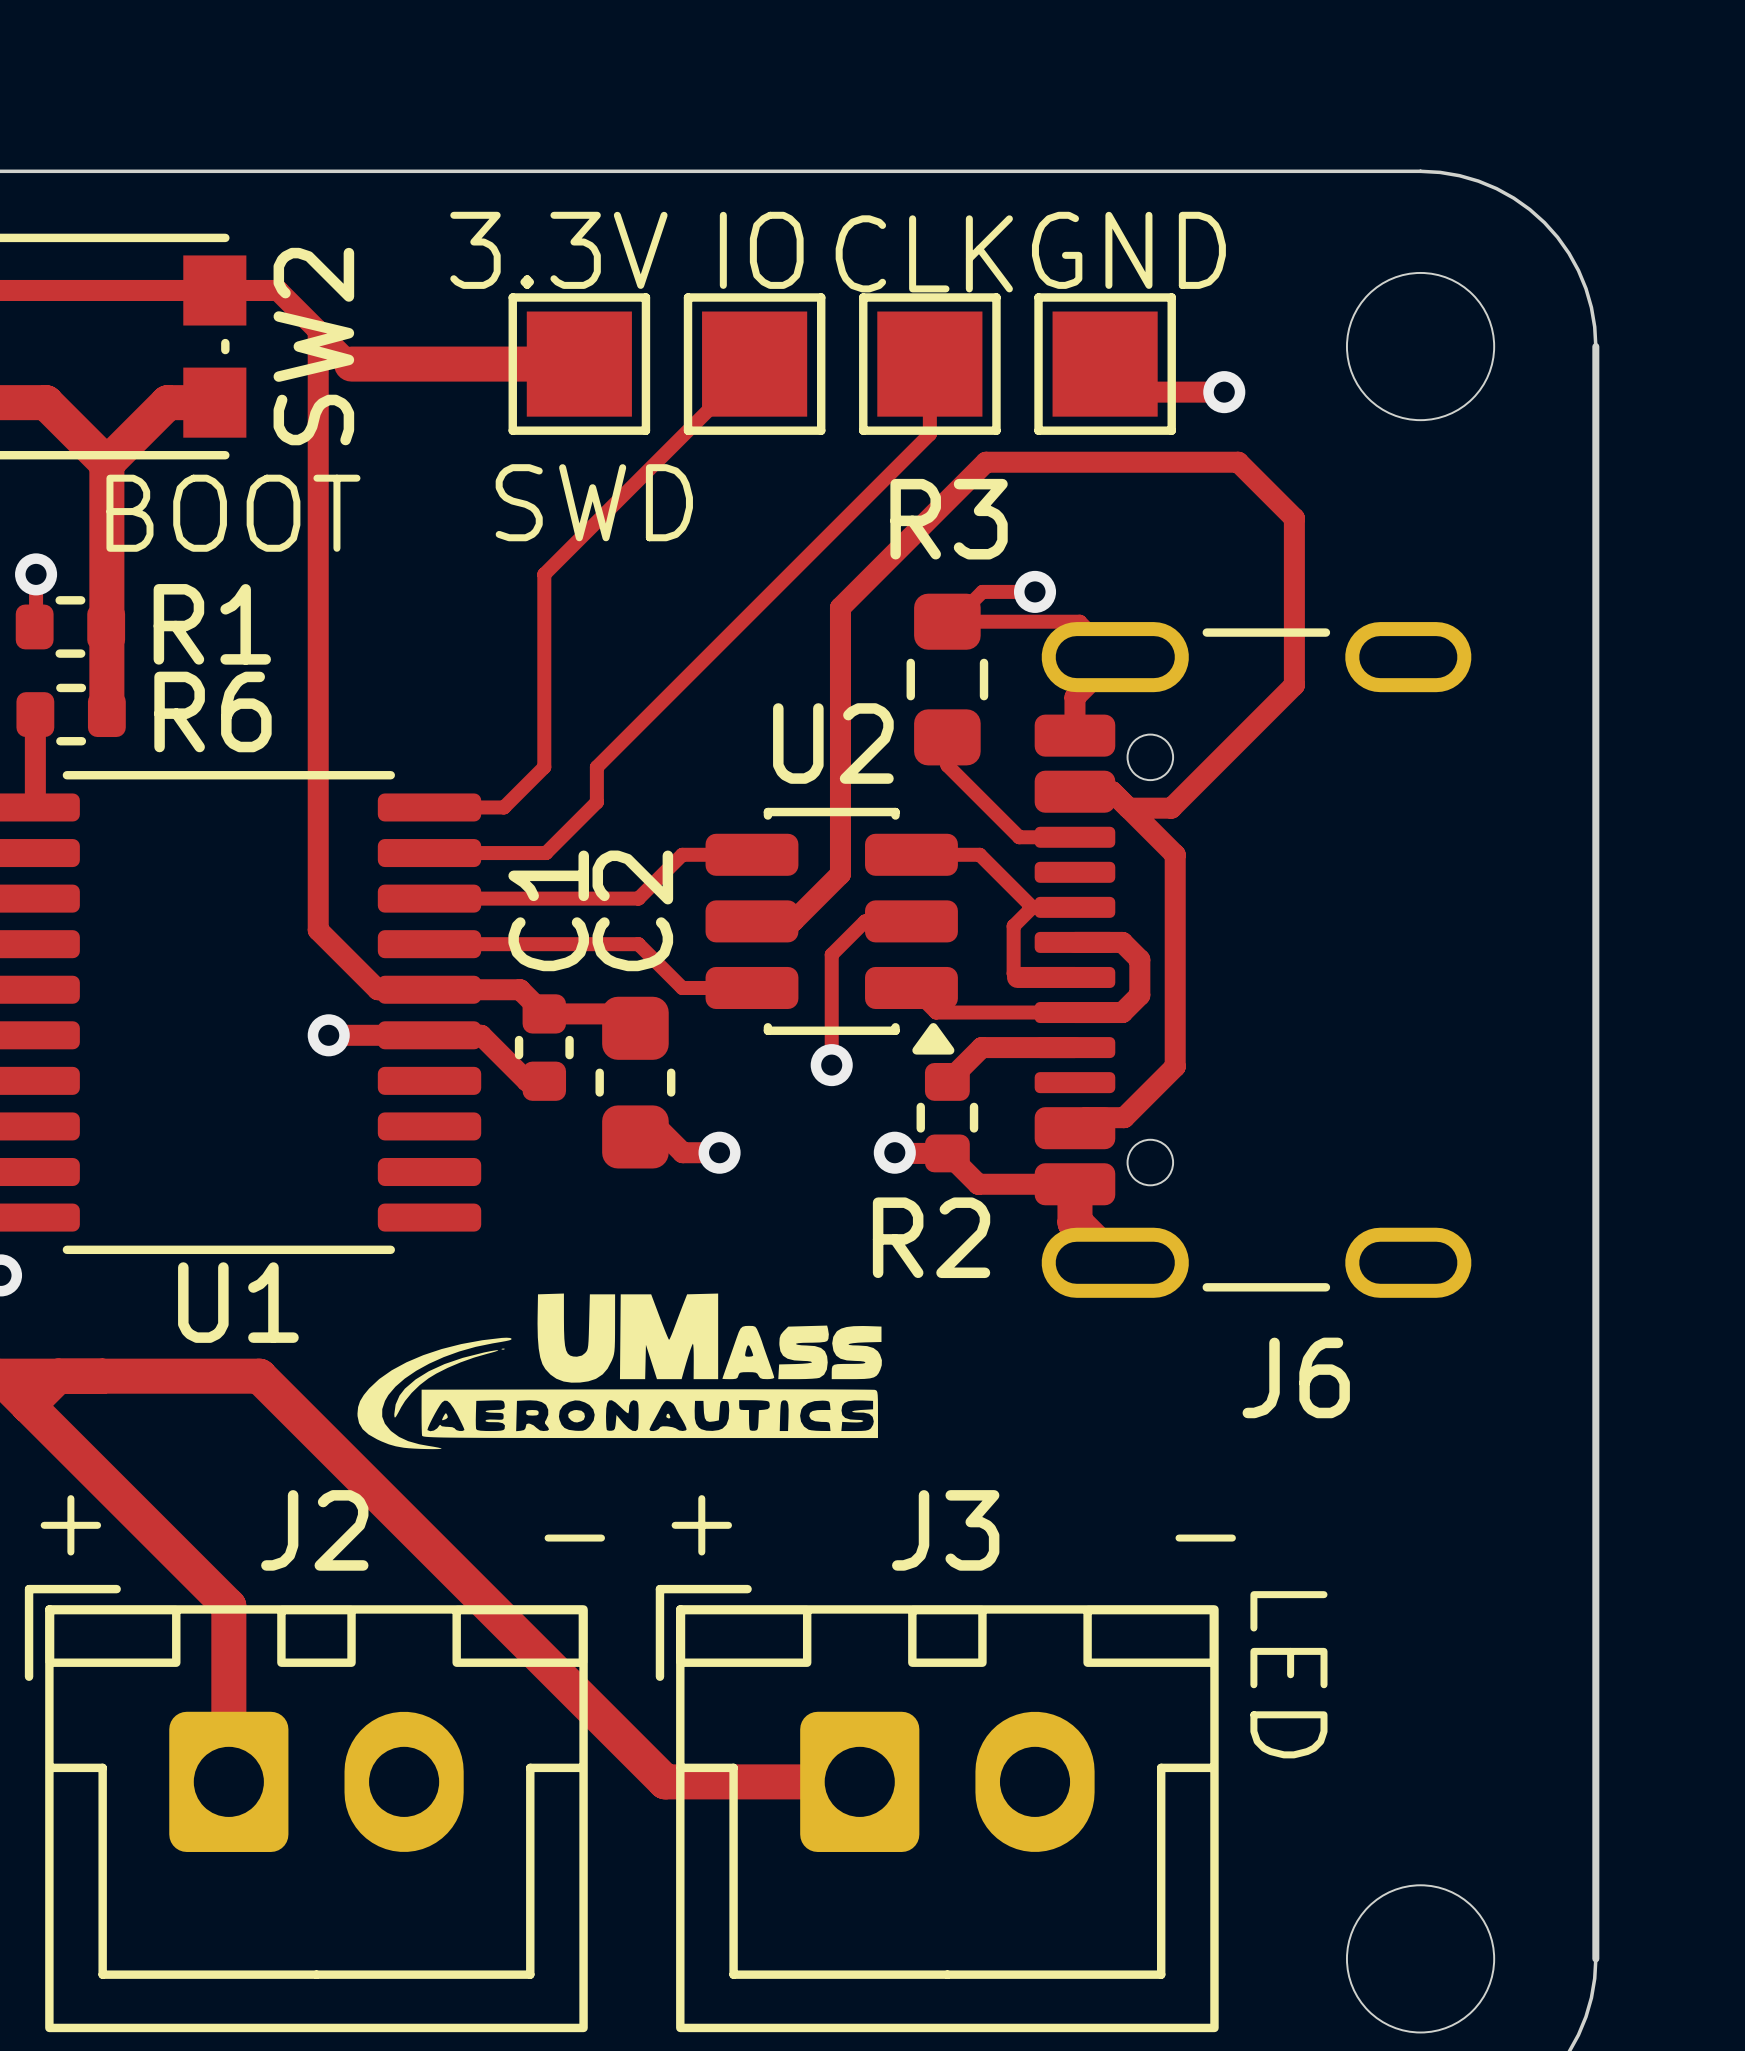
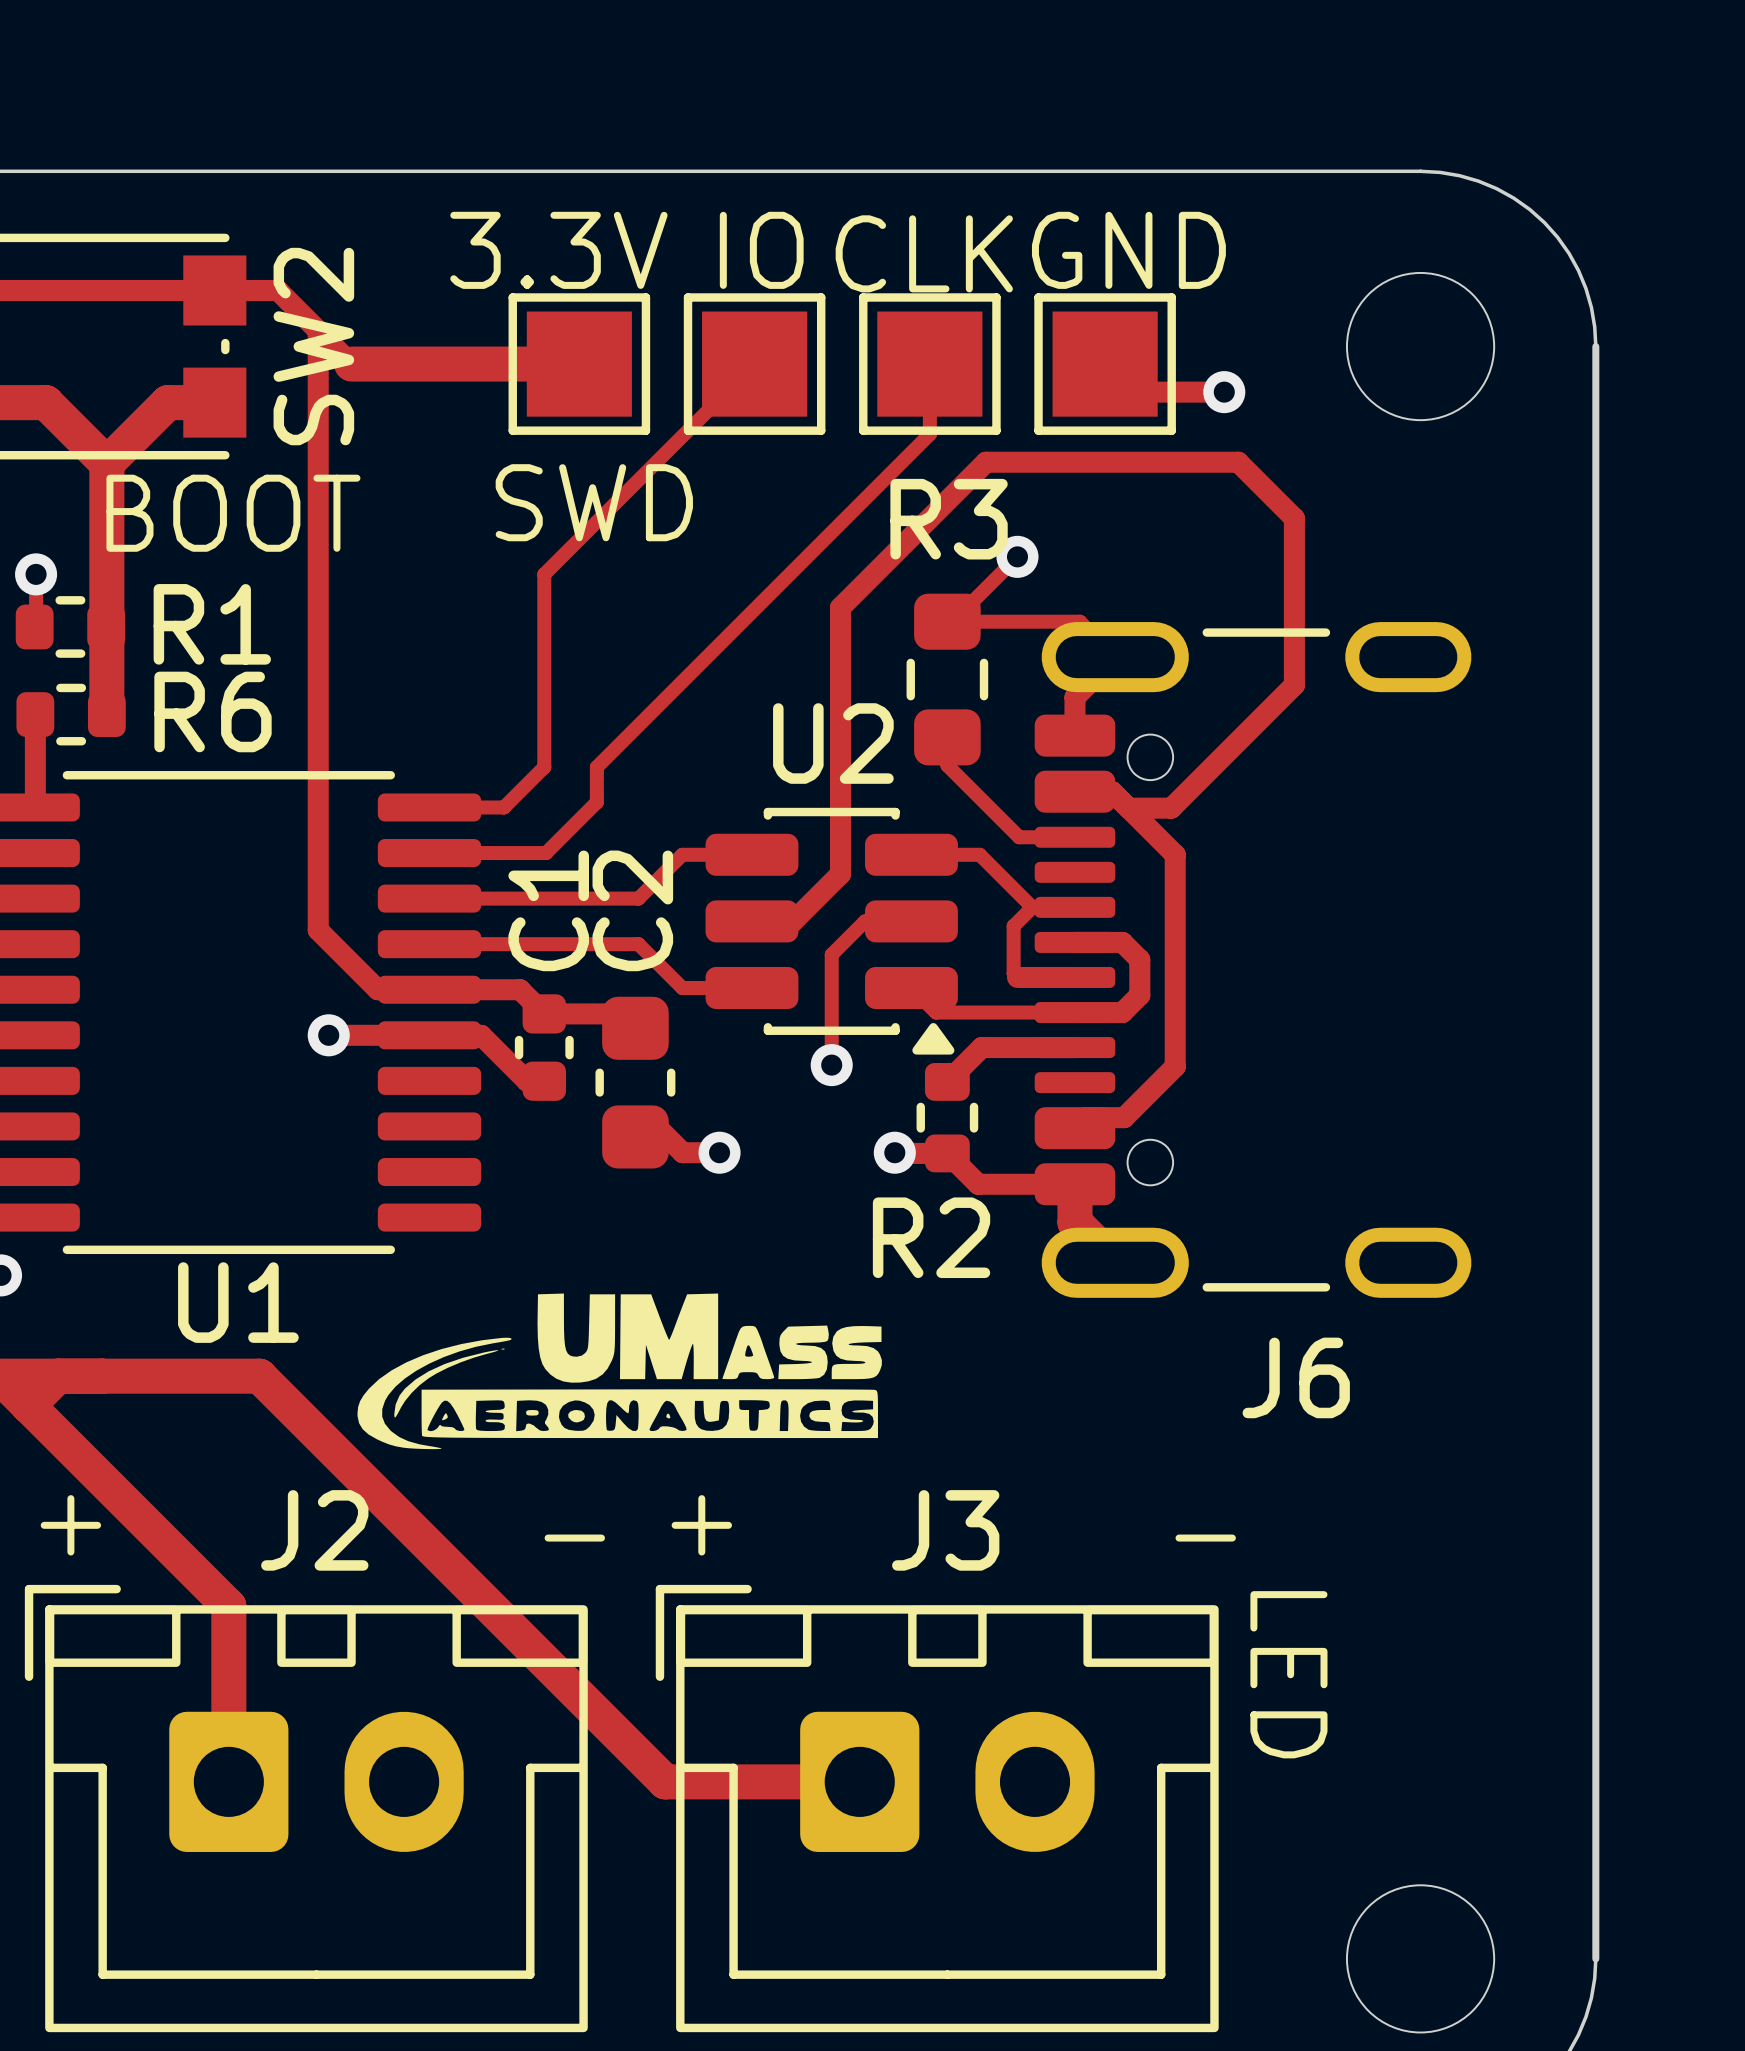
track: (982, 591) (1035, 591) -> (982, 591) (1017, 556)
via position: (1035, 591) -> (1017, 556)

